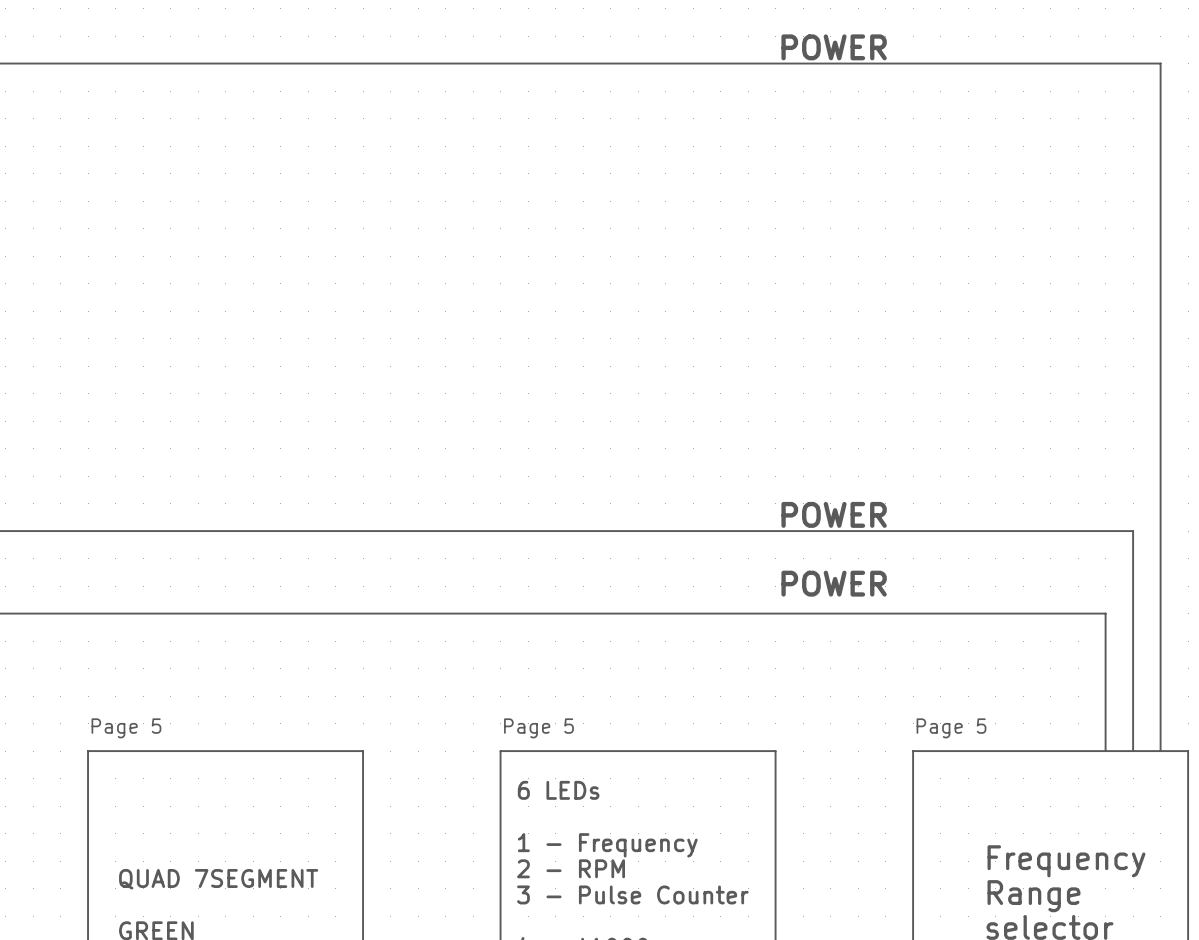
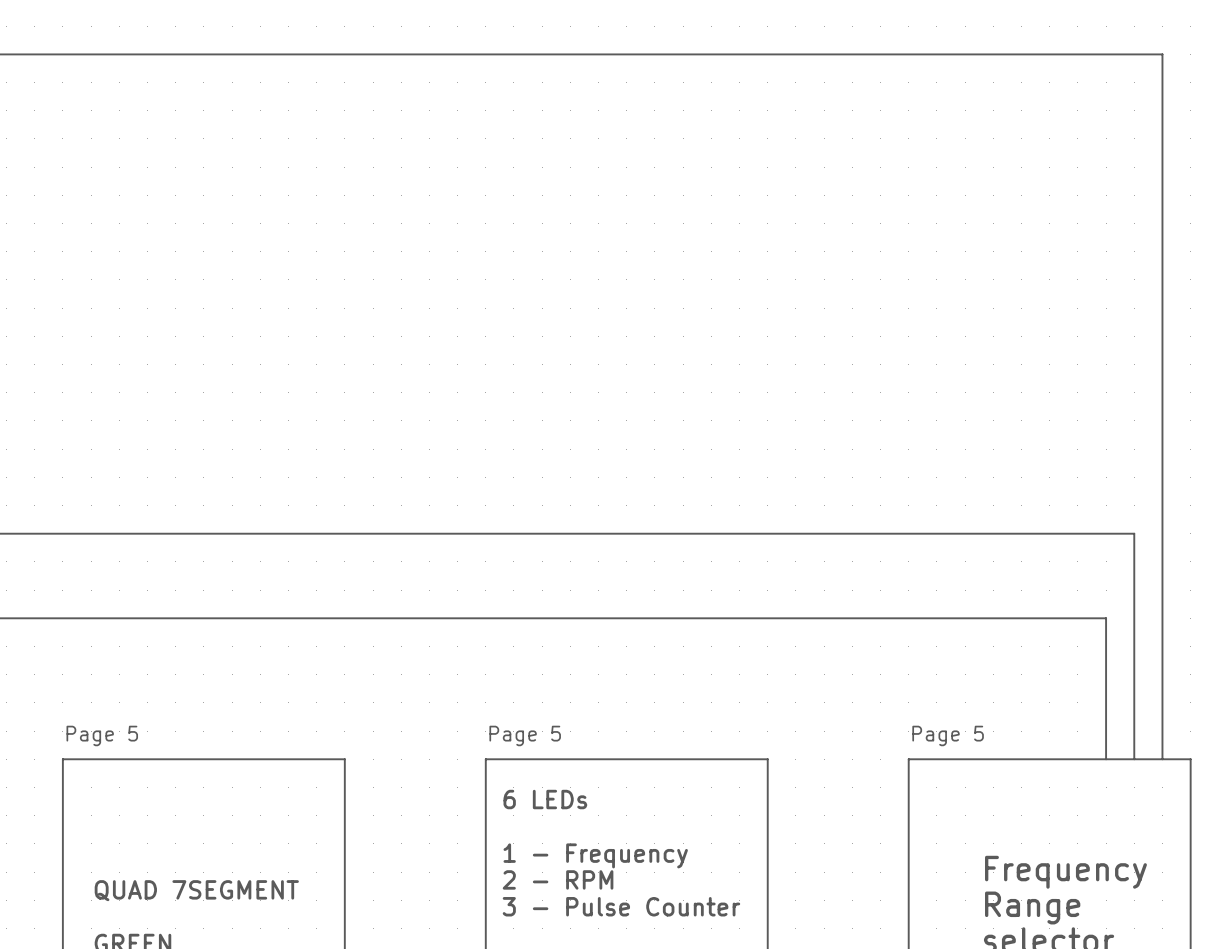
text: POWER (834, 47) -> none
text: POWER (834, 514) -> none
text: POWER (834, 583) -> none

